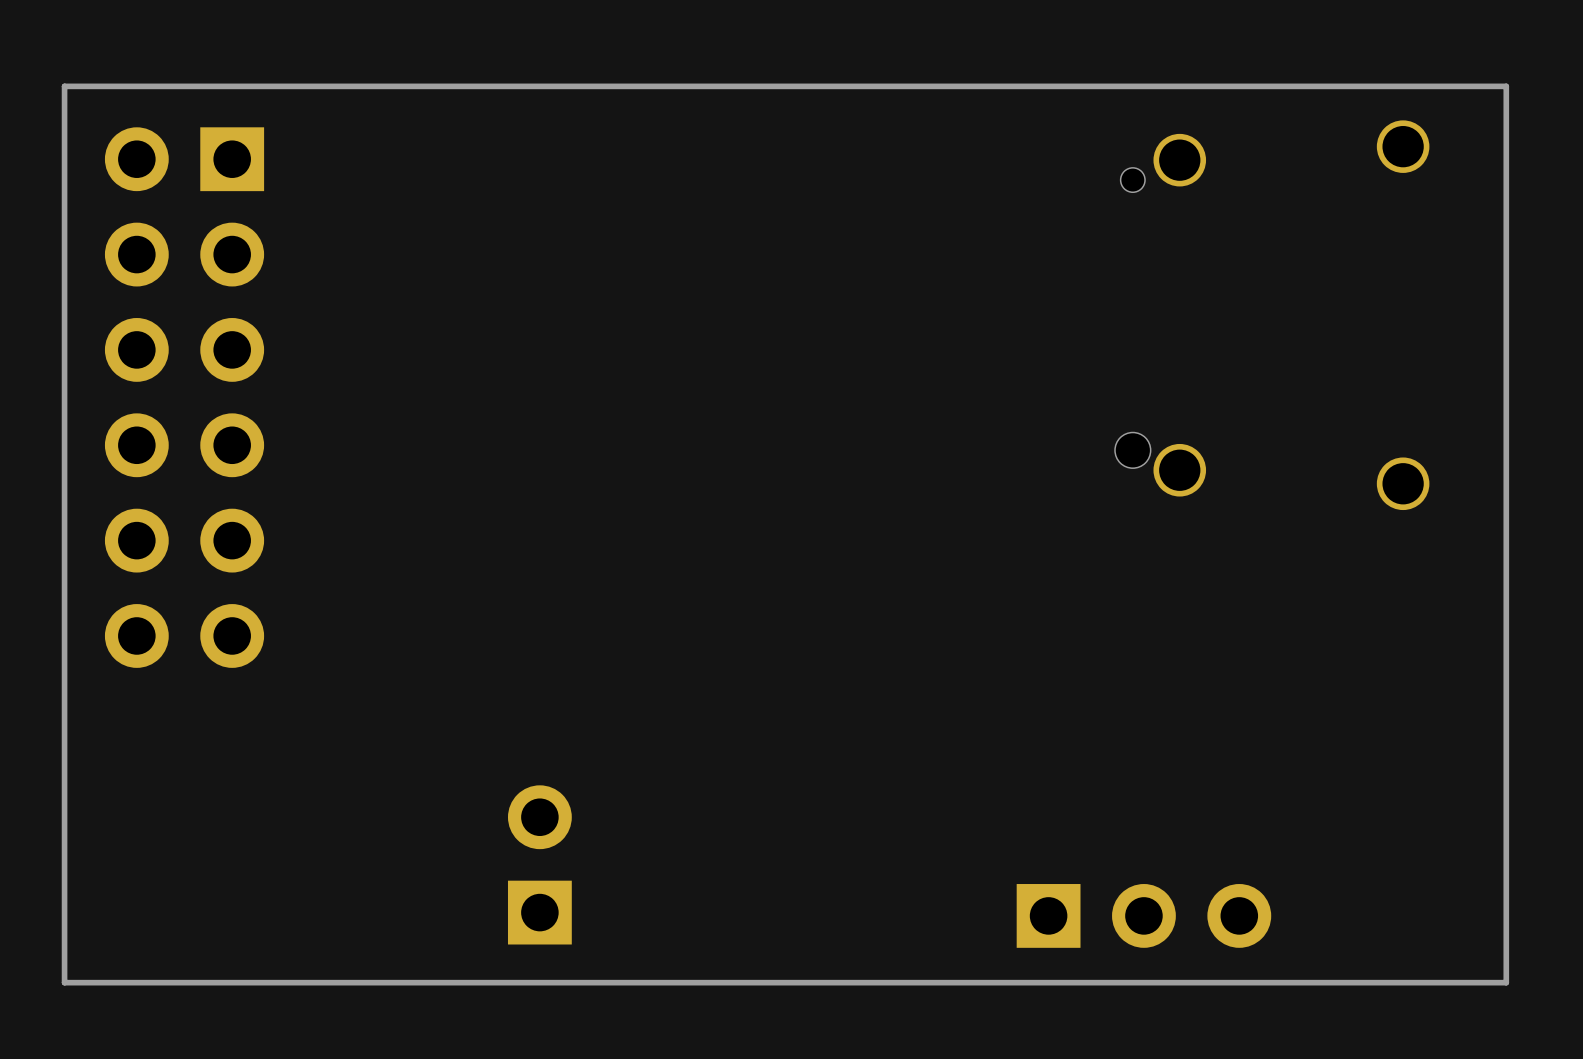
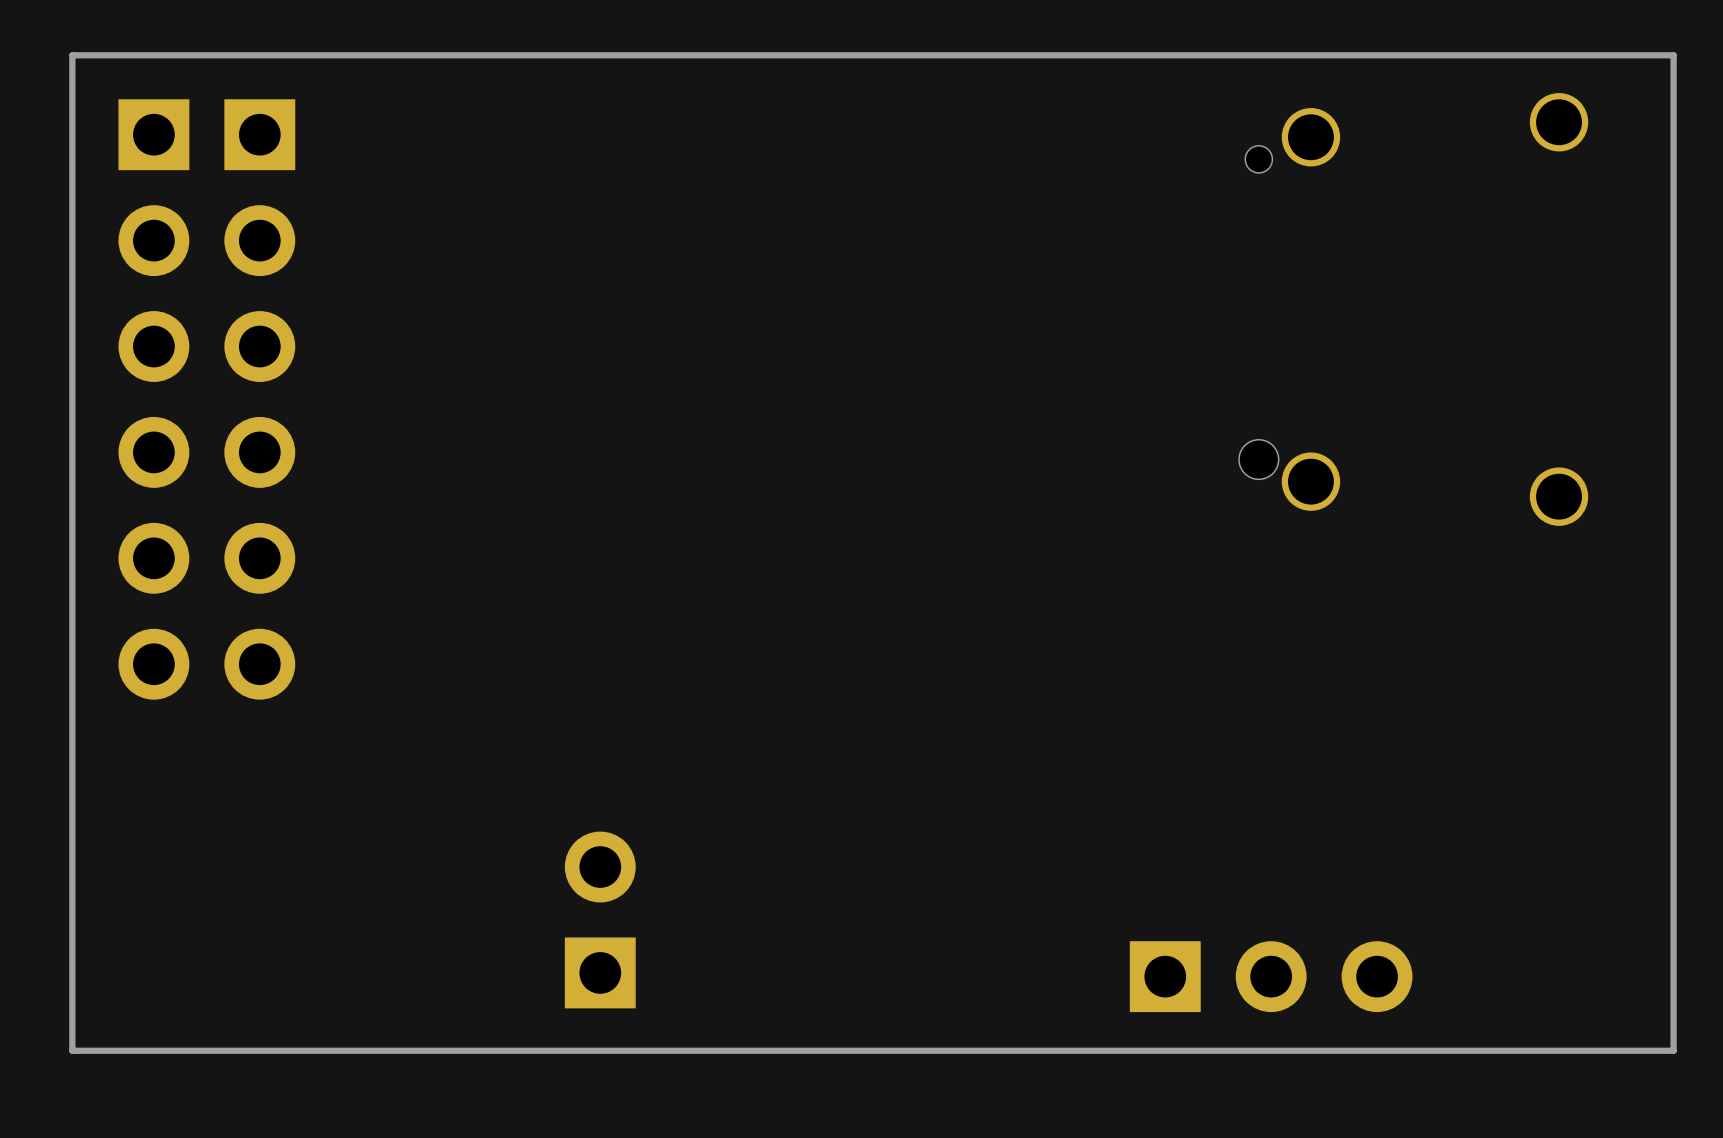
part: none -> (153, 399)
part: none -> (259, 399)
part: (184, 397) -> none

